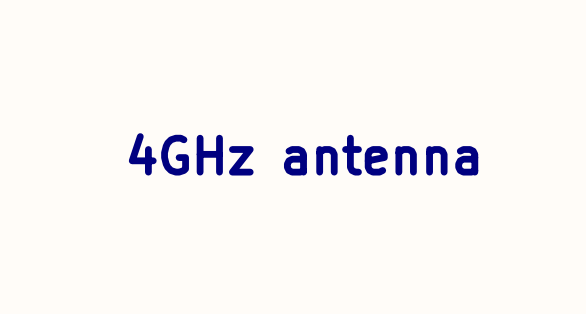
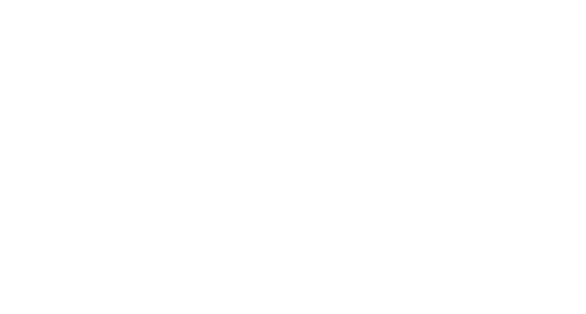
text: 4GHz antenna (303, 154) -> none

